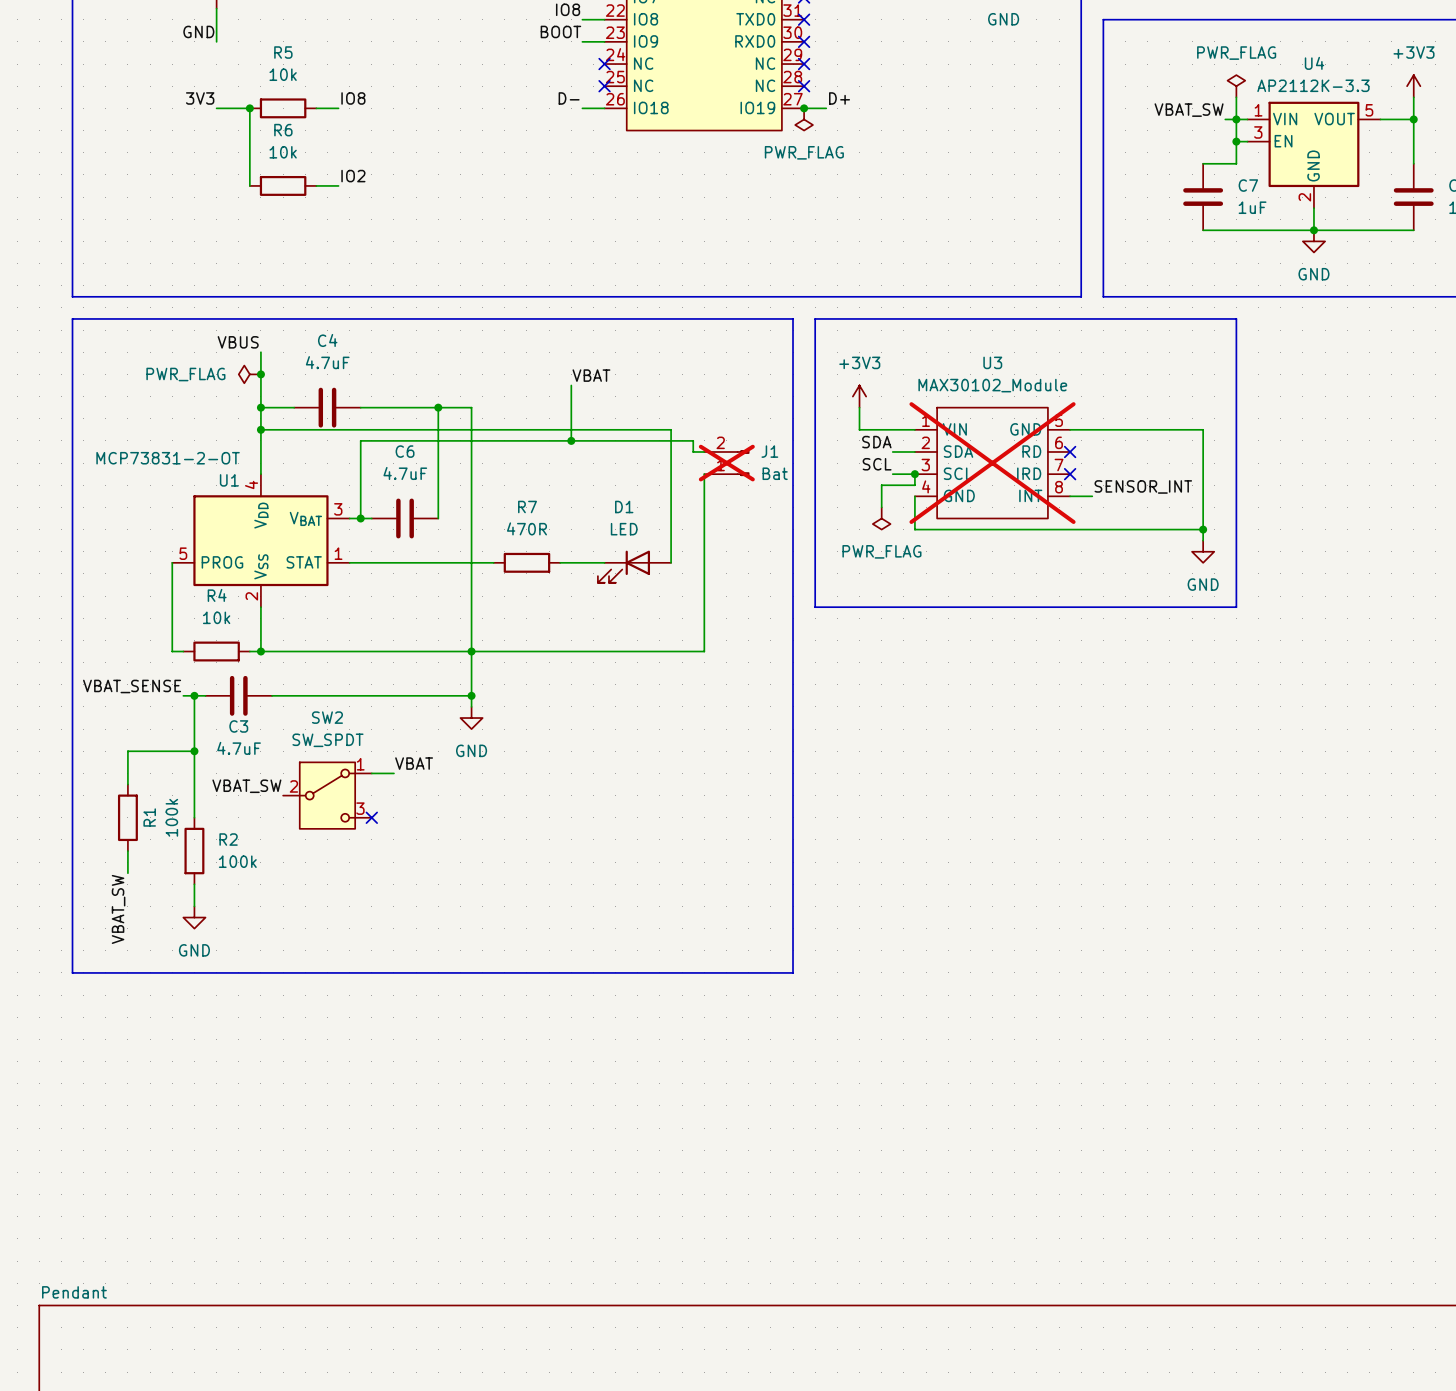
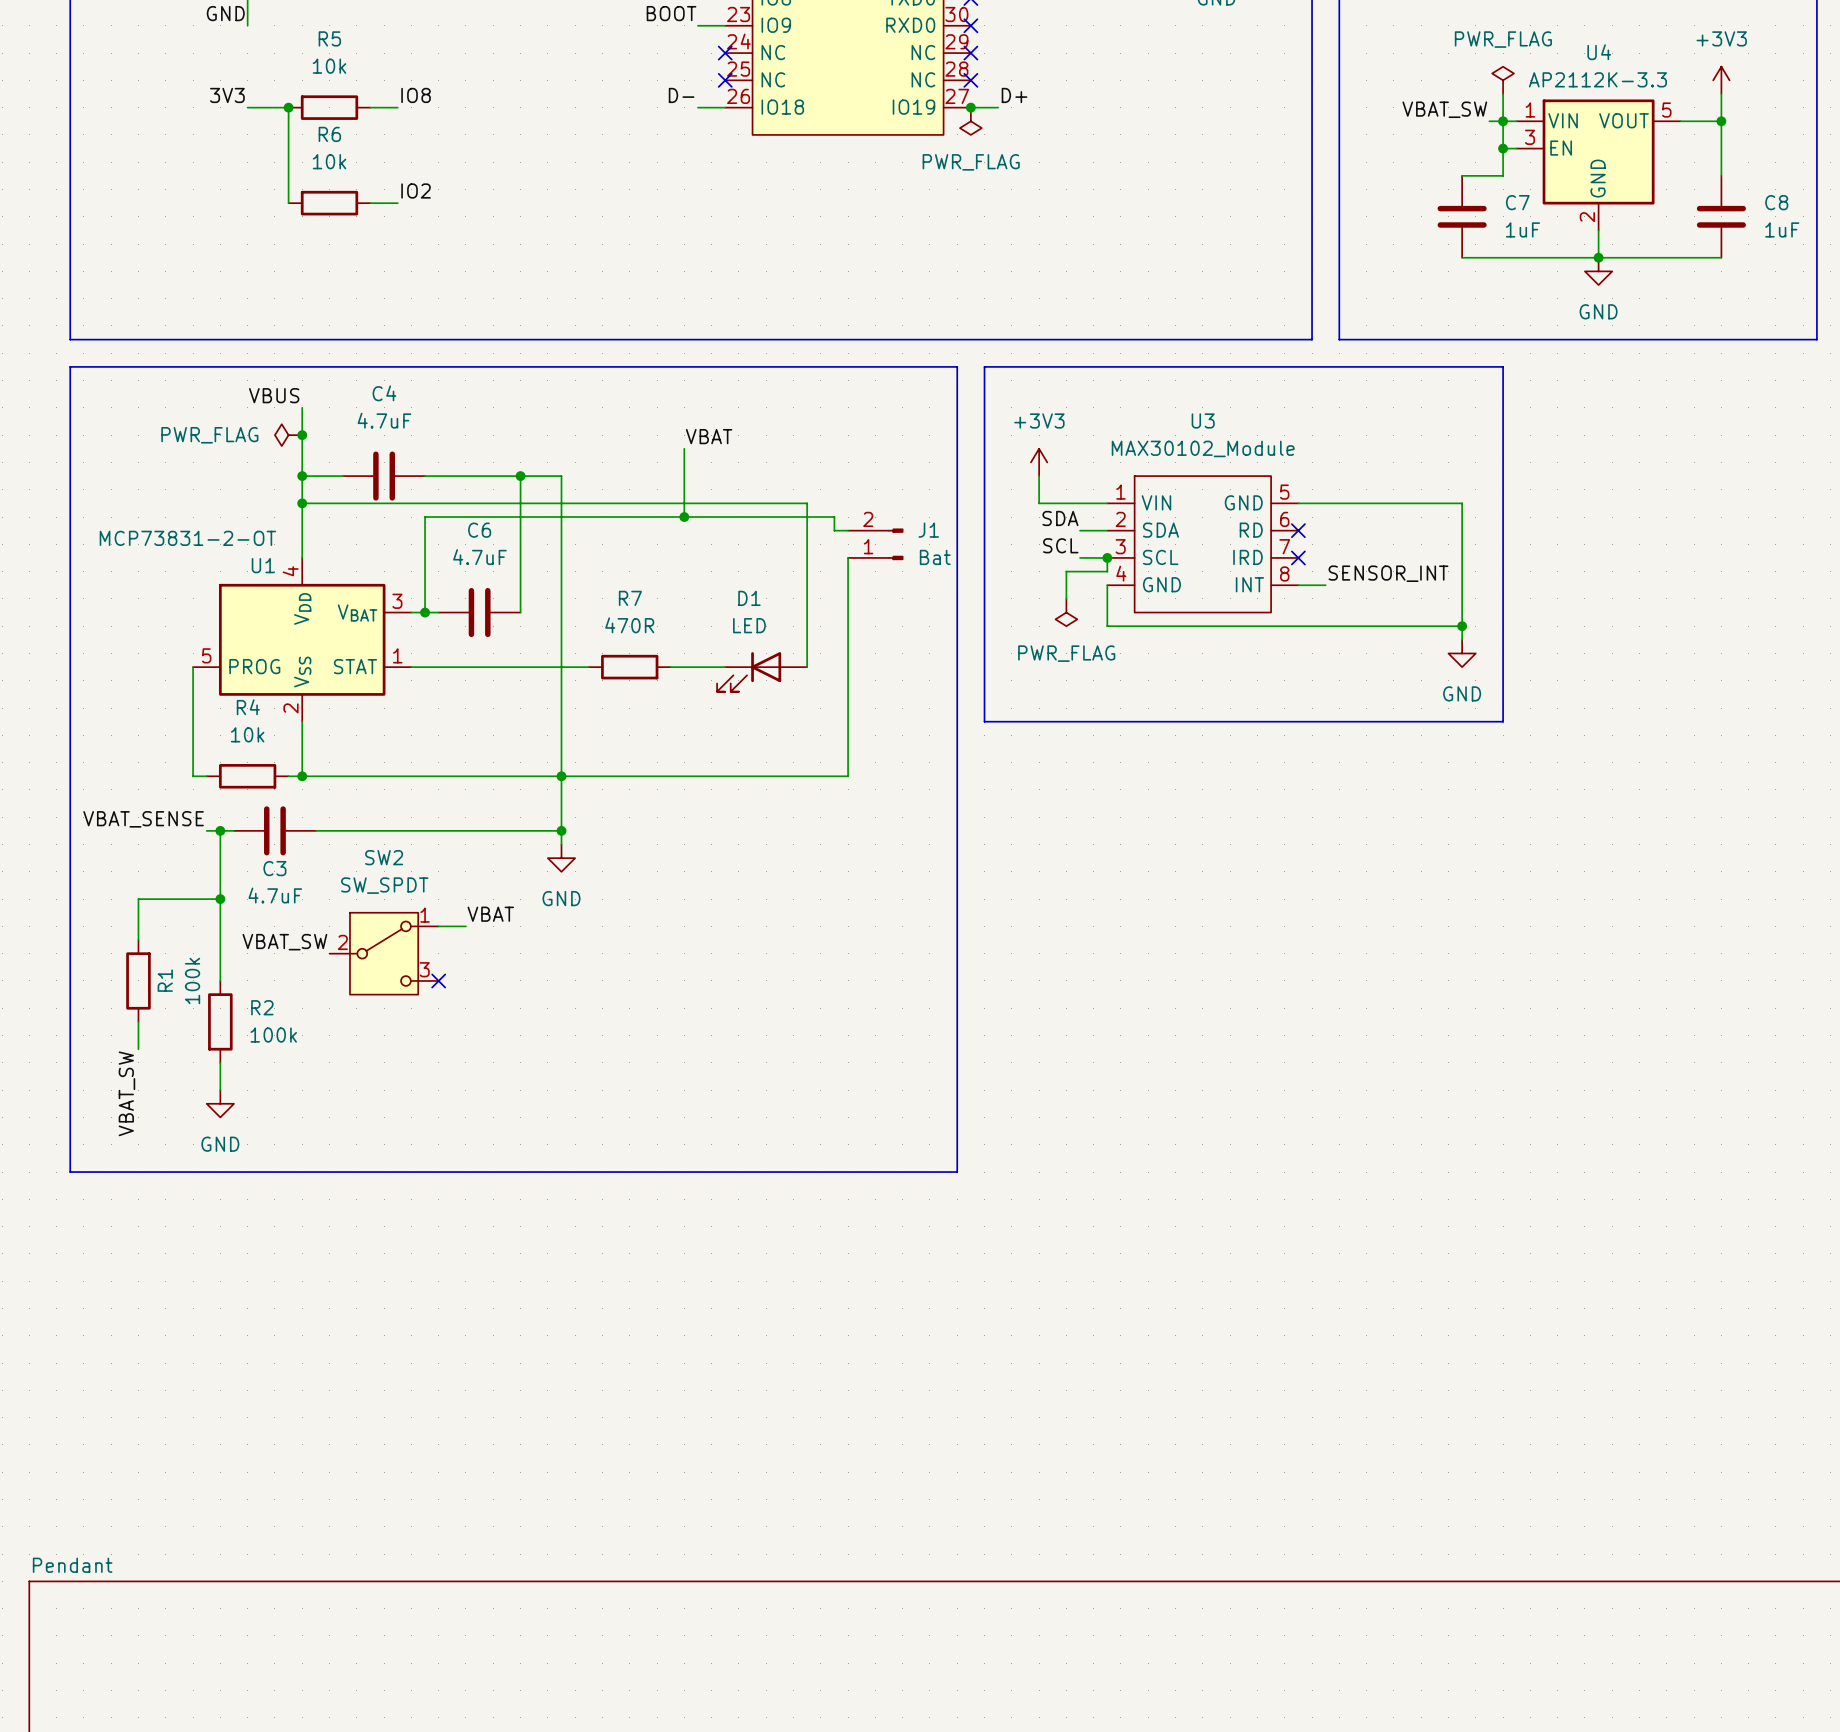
J1 do-not-place cross: (726, 463) -> none
U3 do-not-place cross: (992, 463) -> none

